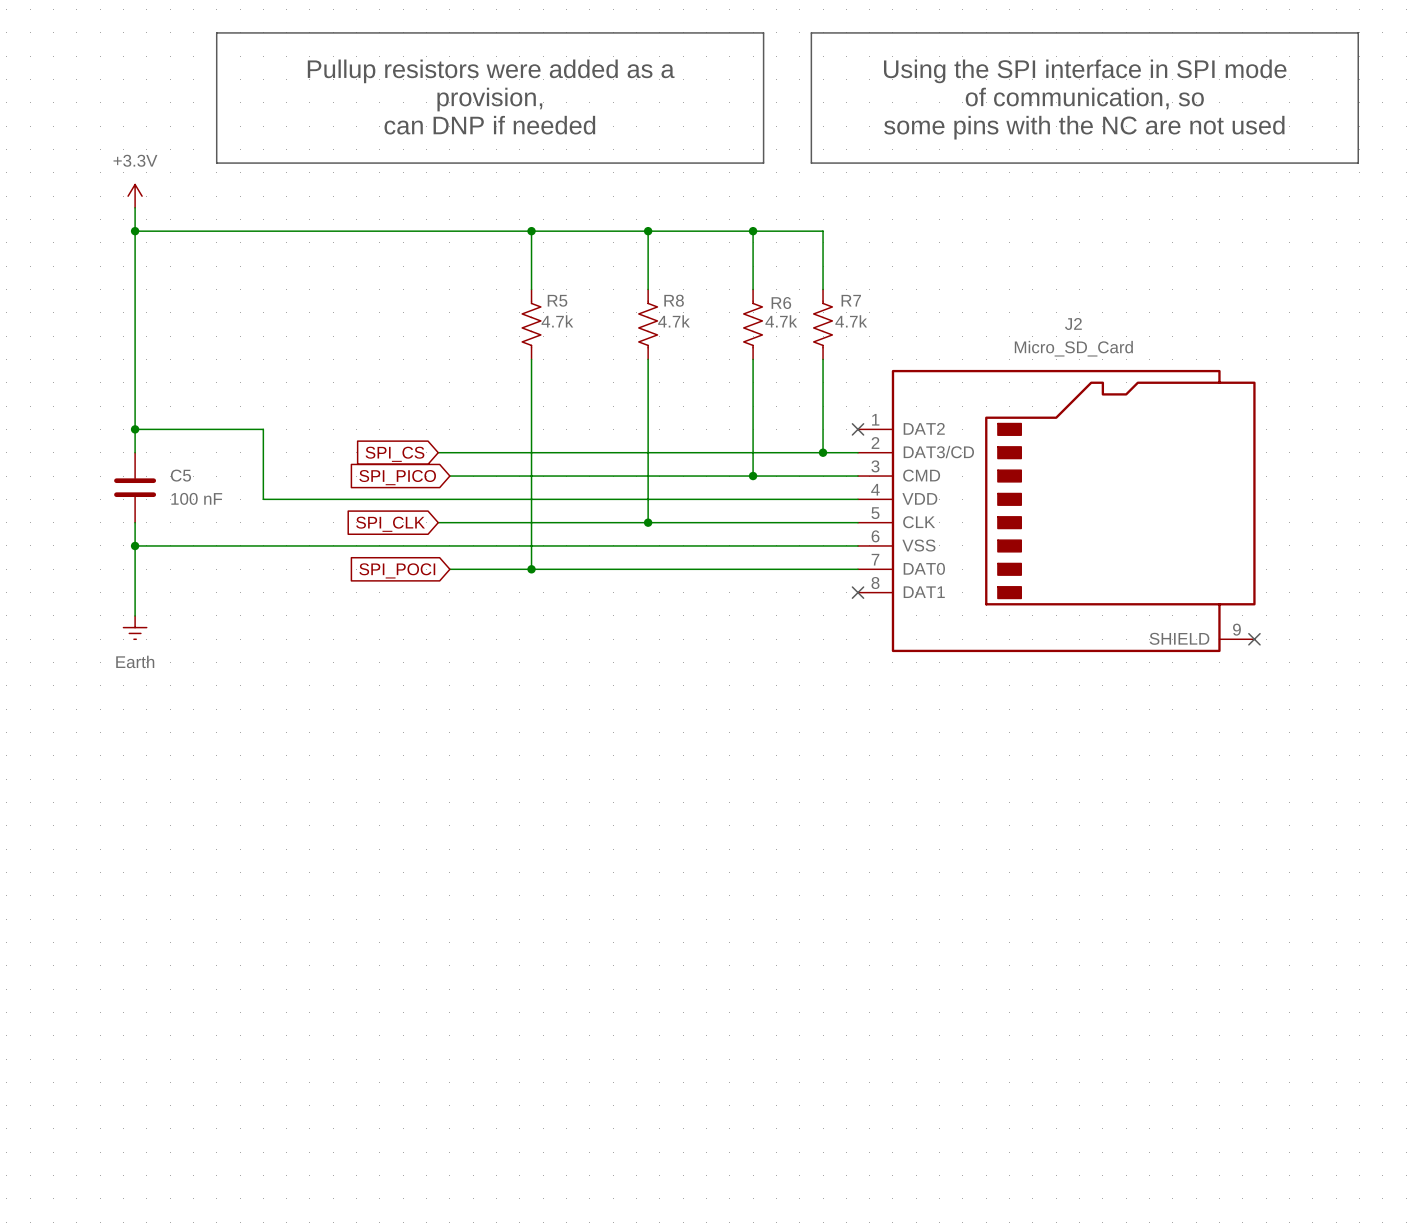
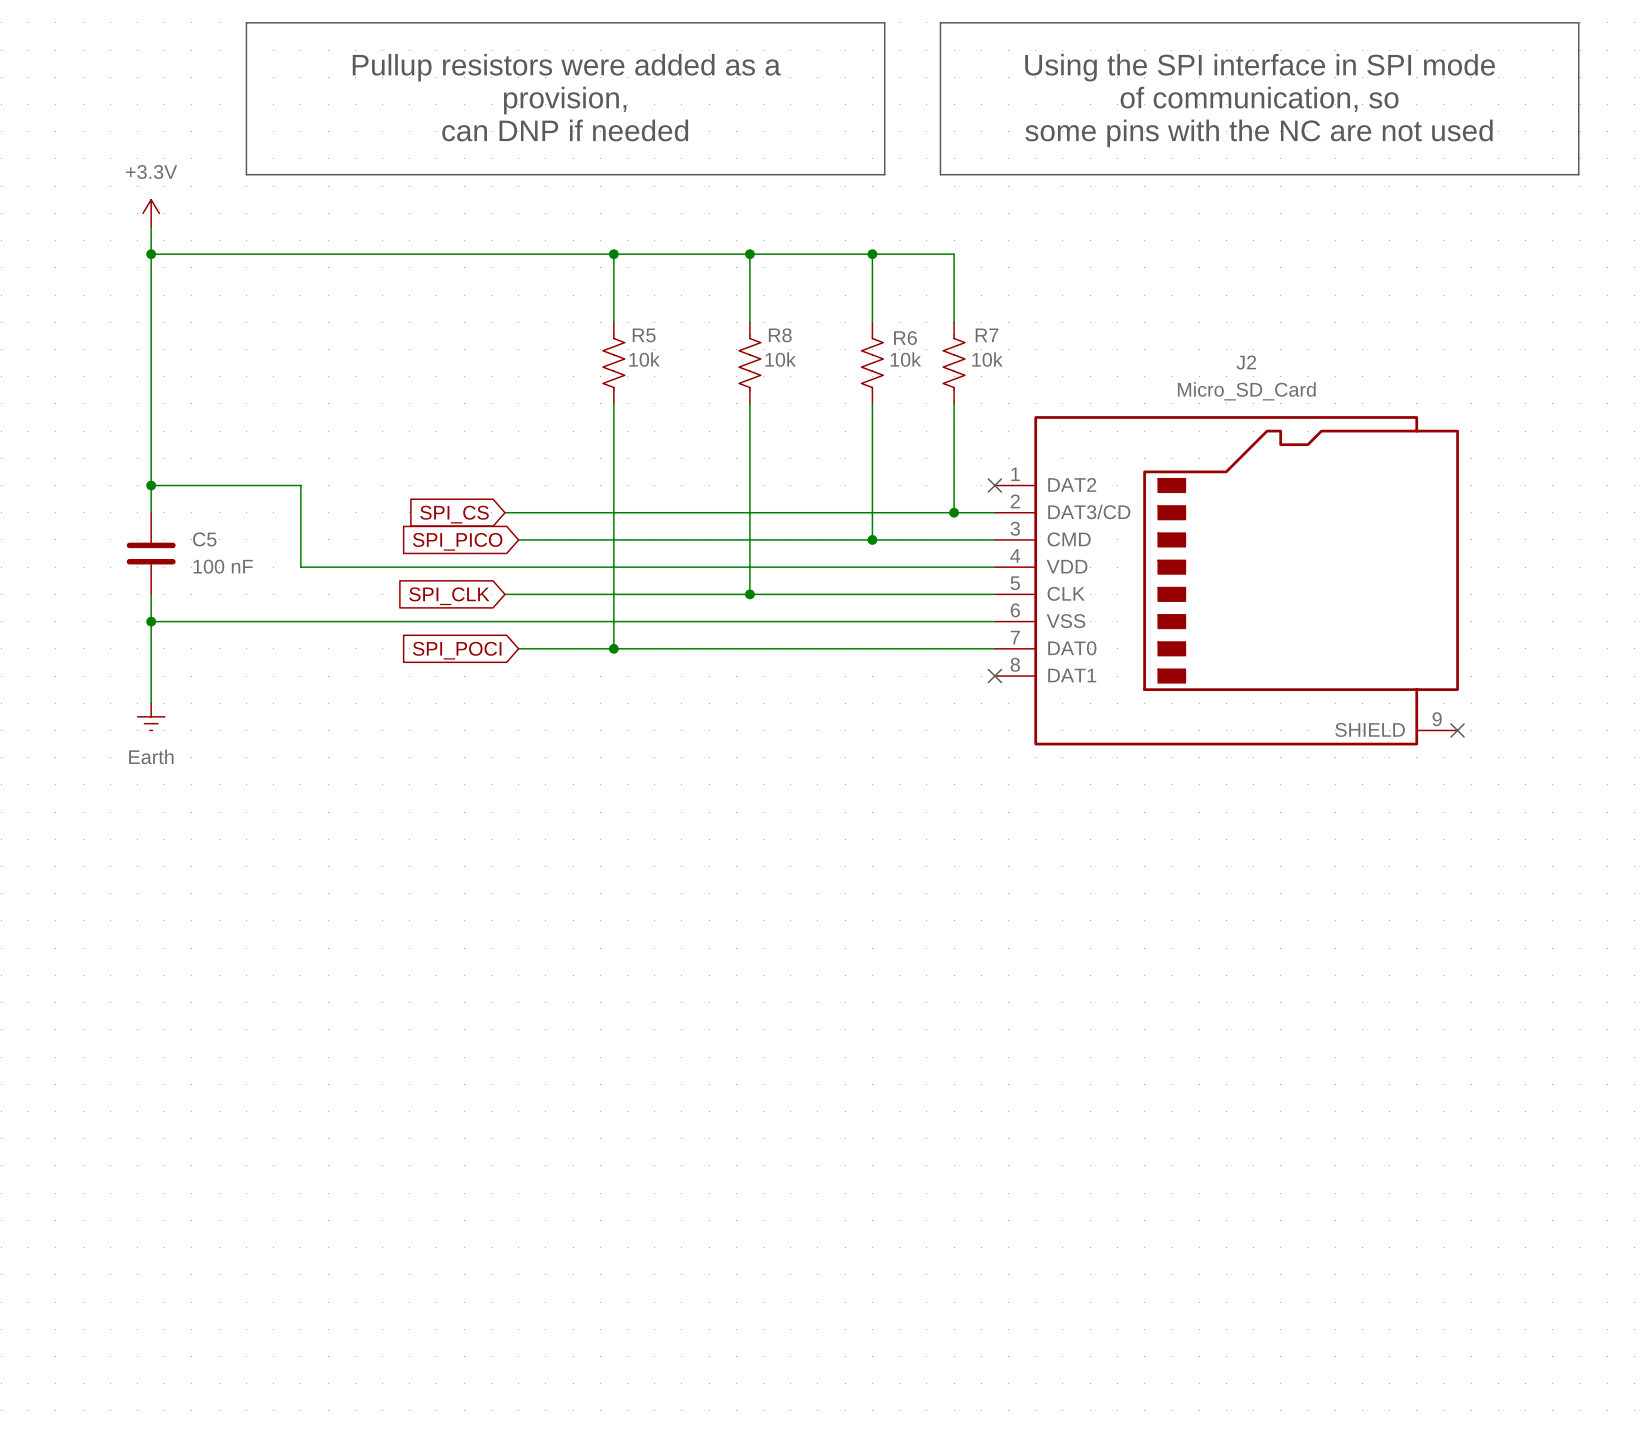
R5 value: 4.7k (557, 321) -> 10k (644, 359)
R8 value: 4.7k (673, 321) -> 10k (780, 359)
R6 value: 4.7k (781, 321) -> 10k (905, 359)
R7 value: 4.7k (851, 321) -> 10k (987, 359)

